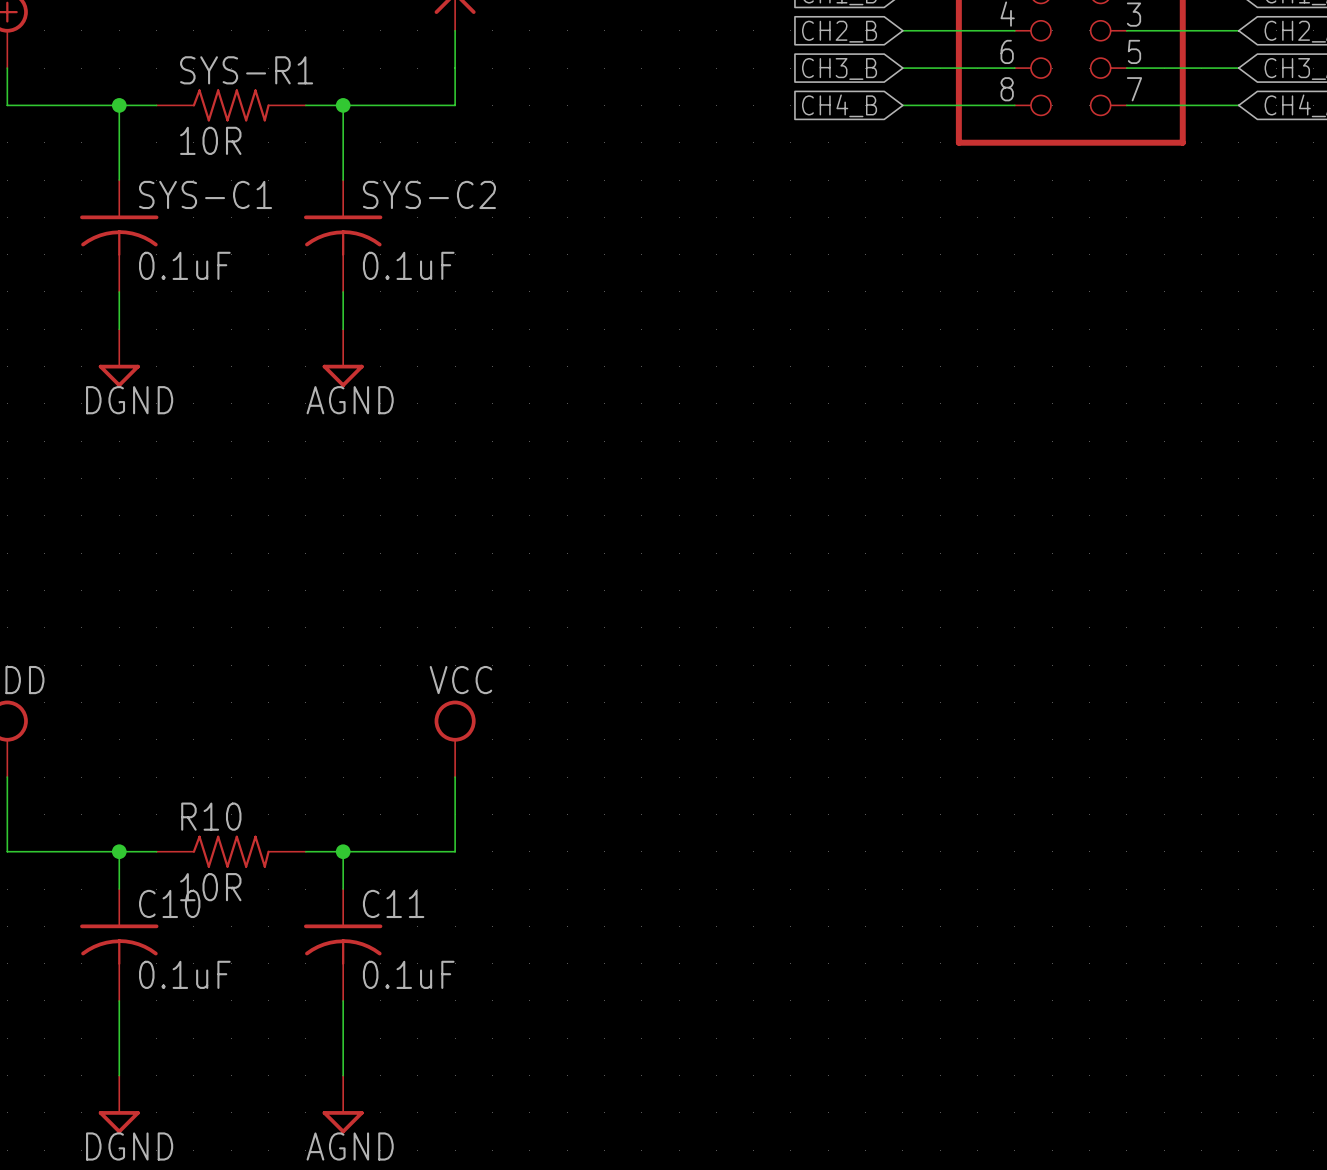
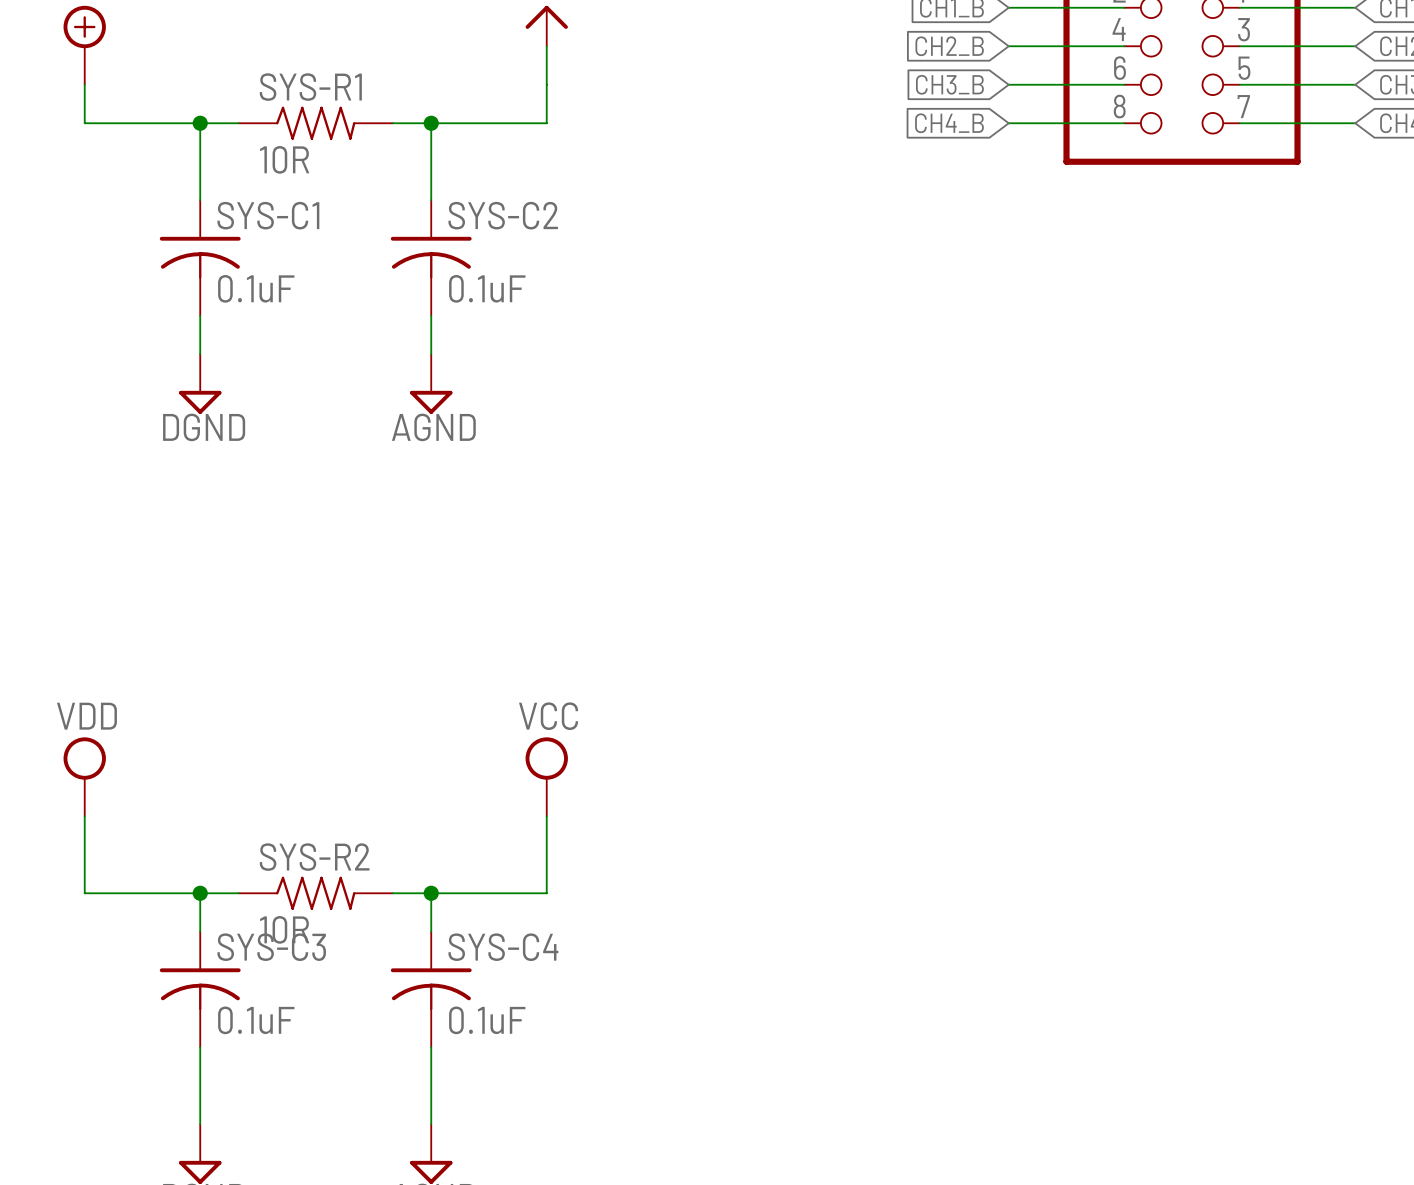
R10 name: R10 (211, 816) -> SYS-R2 (314, 857)
C10 name: C10 (169, 903) -> SYS-C3 (271, 947)
C11 name: C11 (393, 903) -> SYS-C4 (503, 947)

